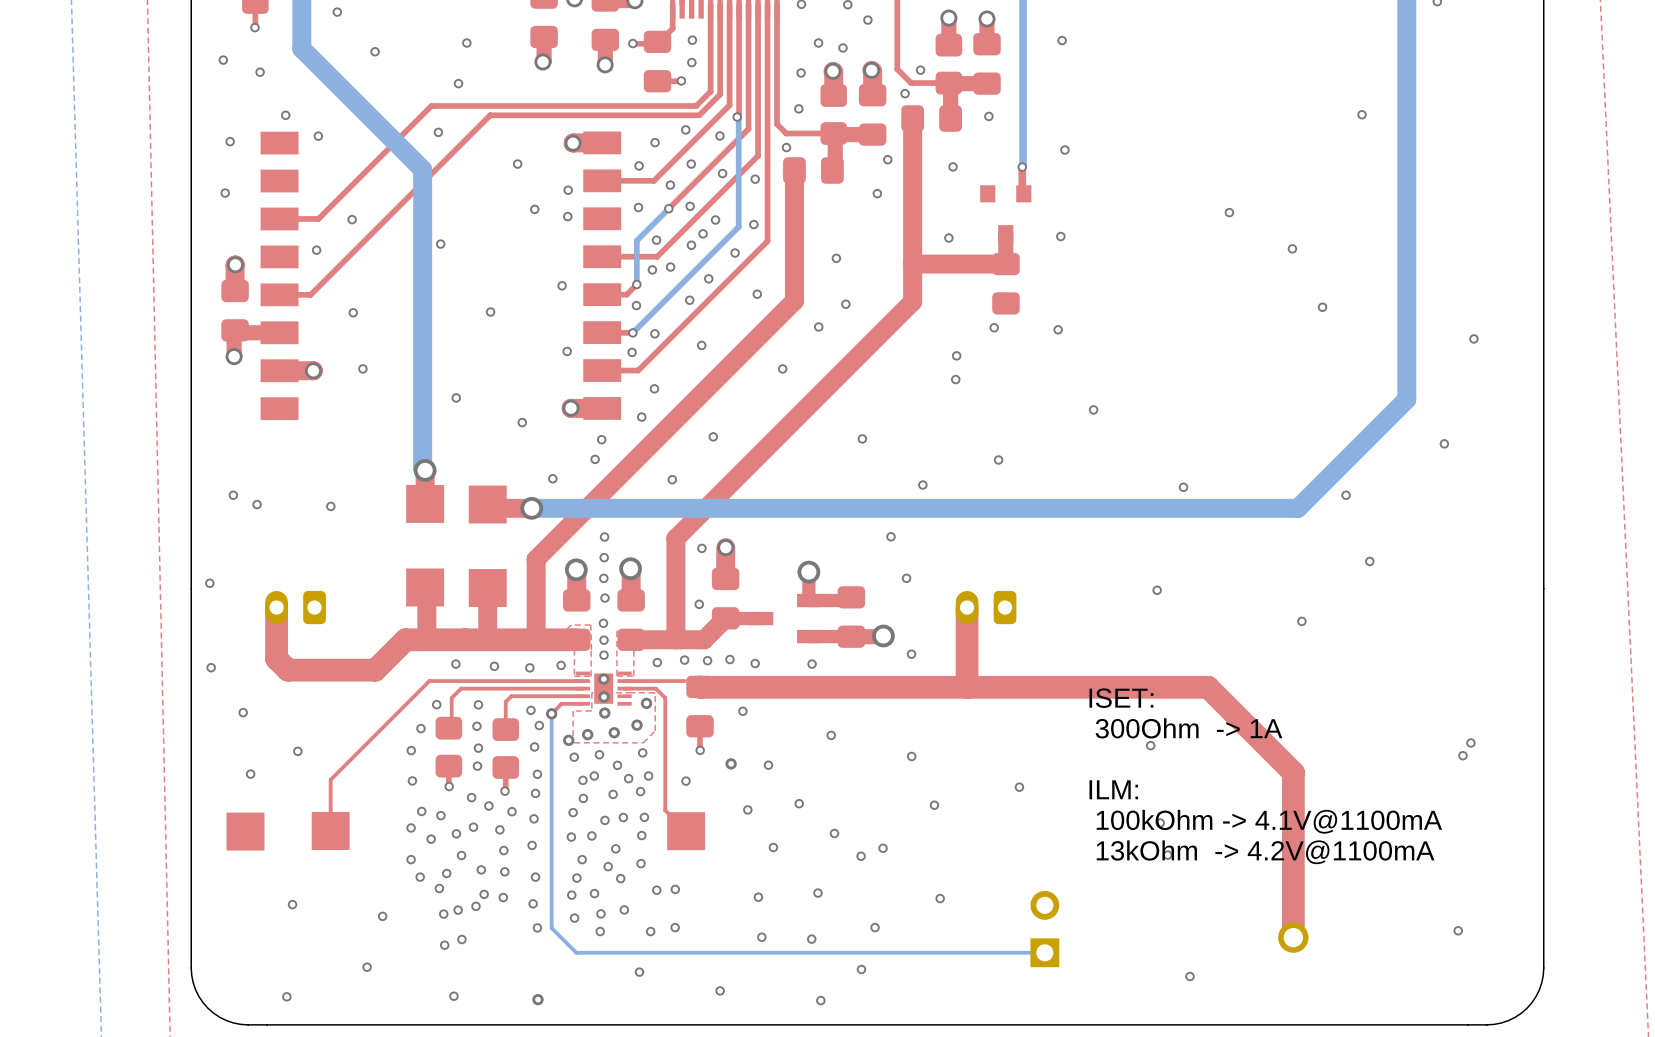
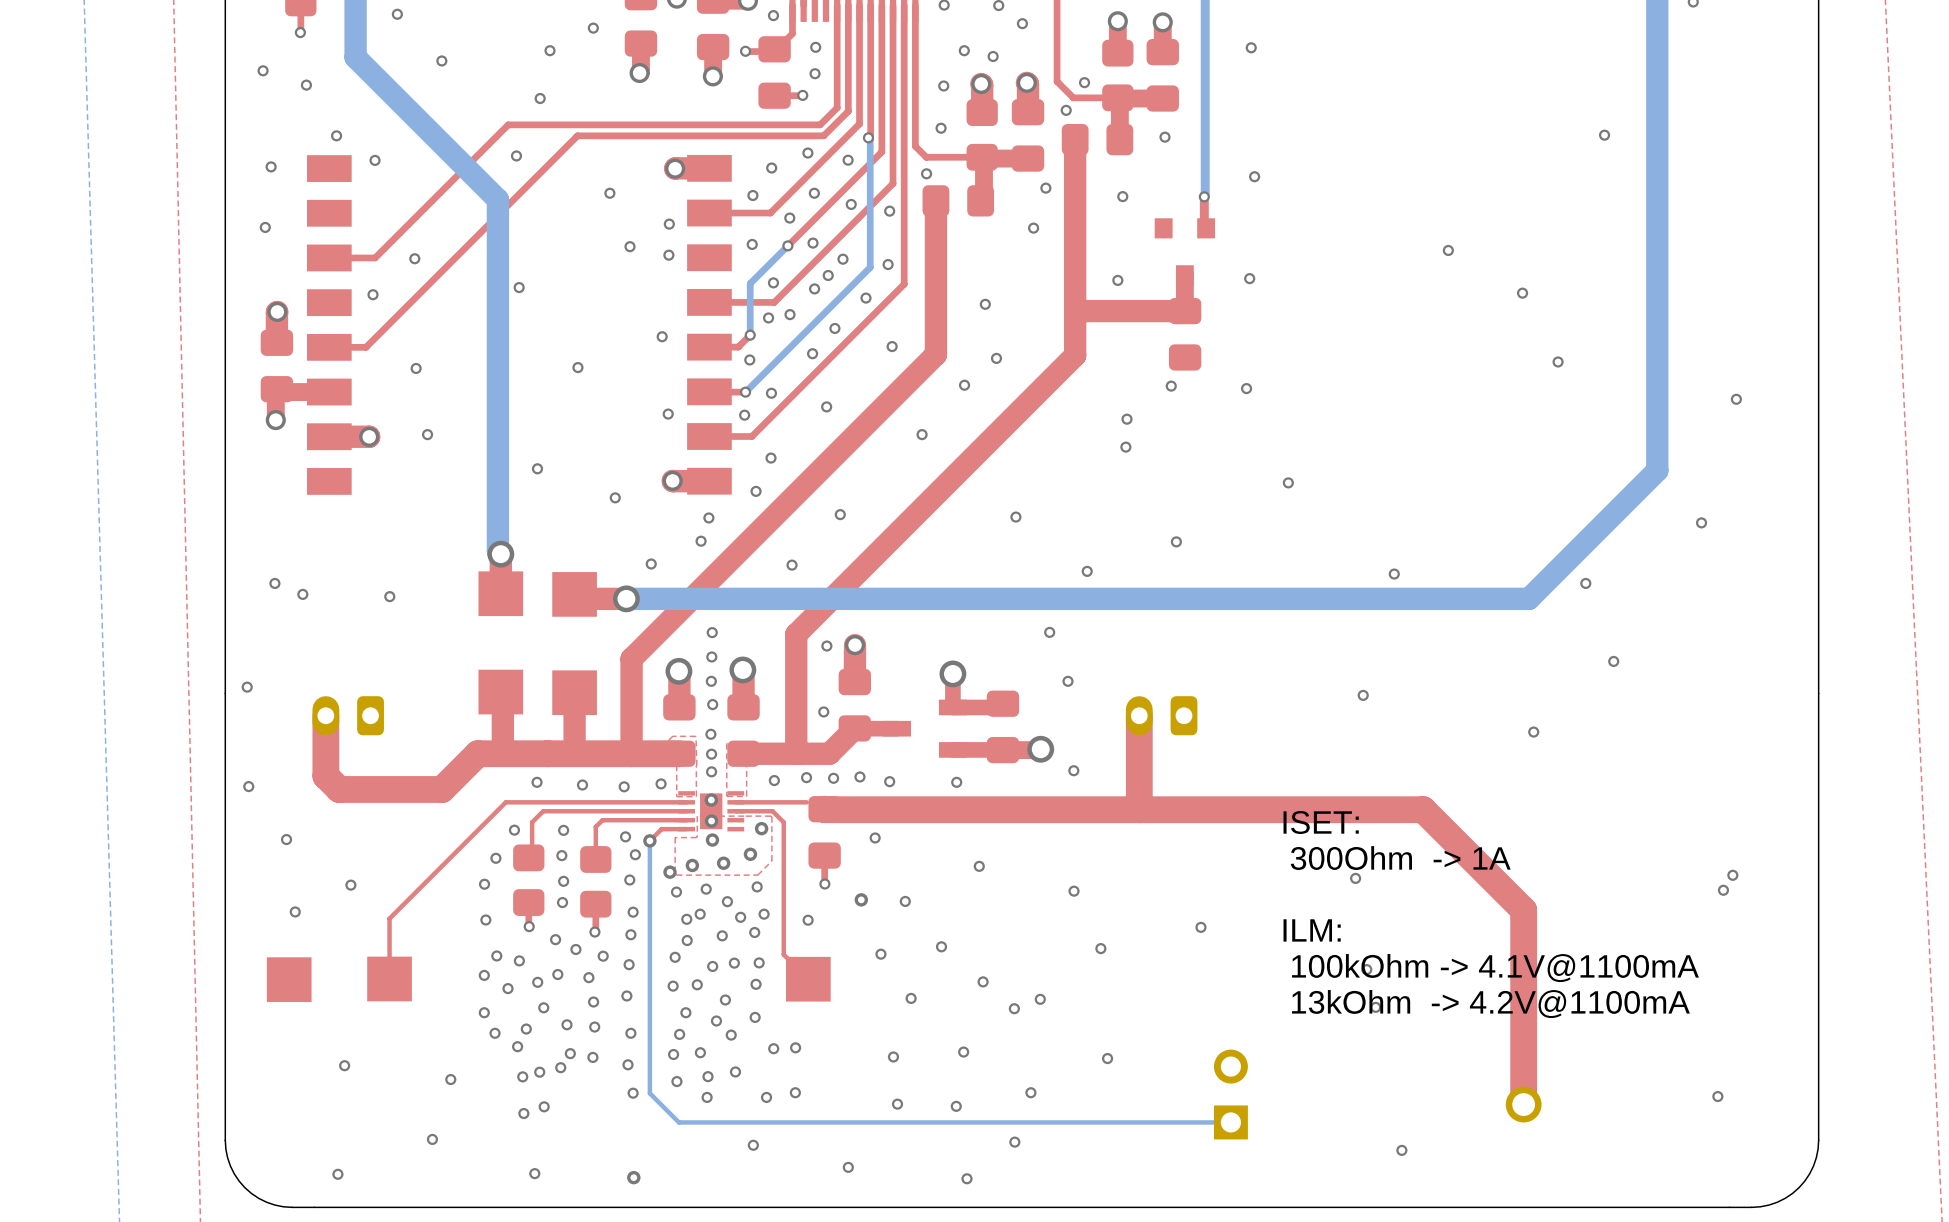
via: none -> (773, 15)
via: none -> (593, 28)

